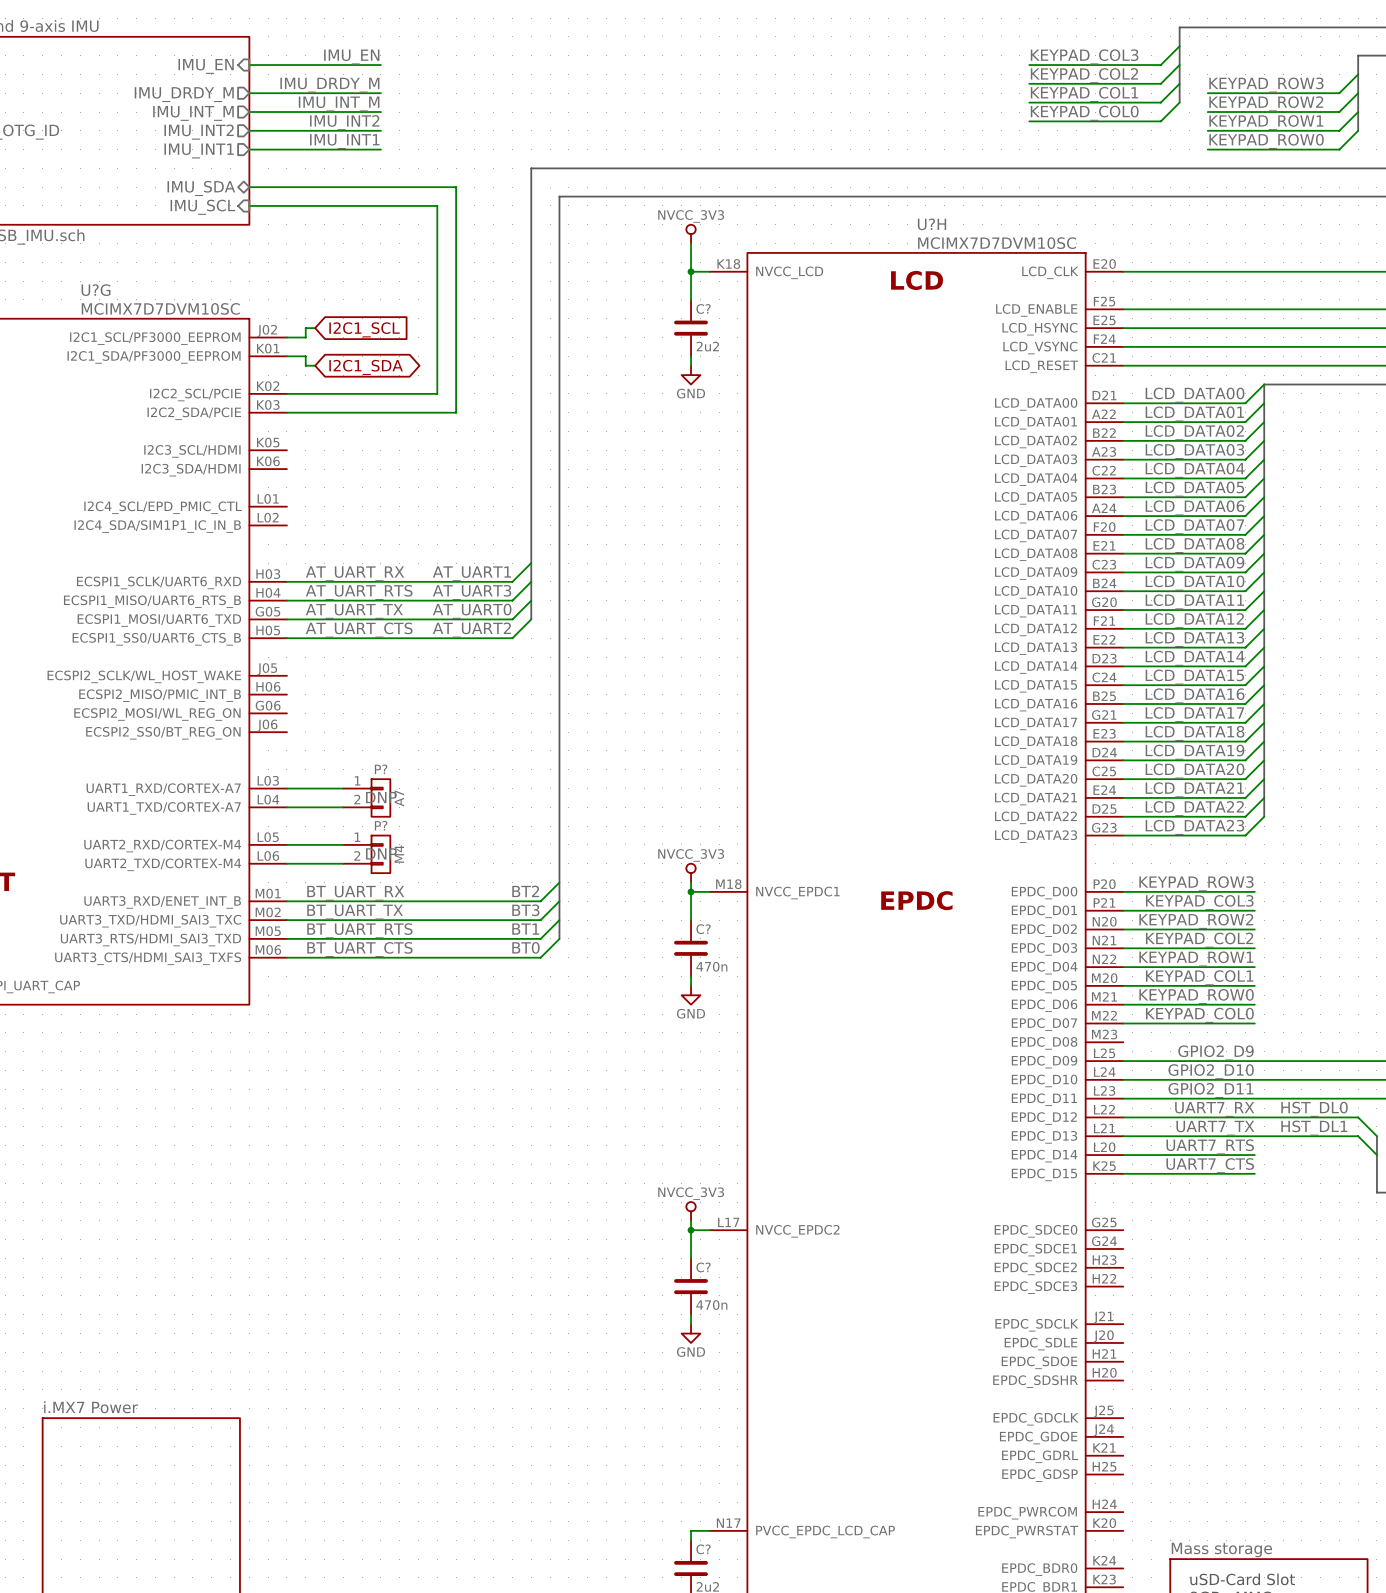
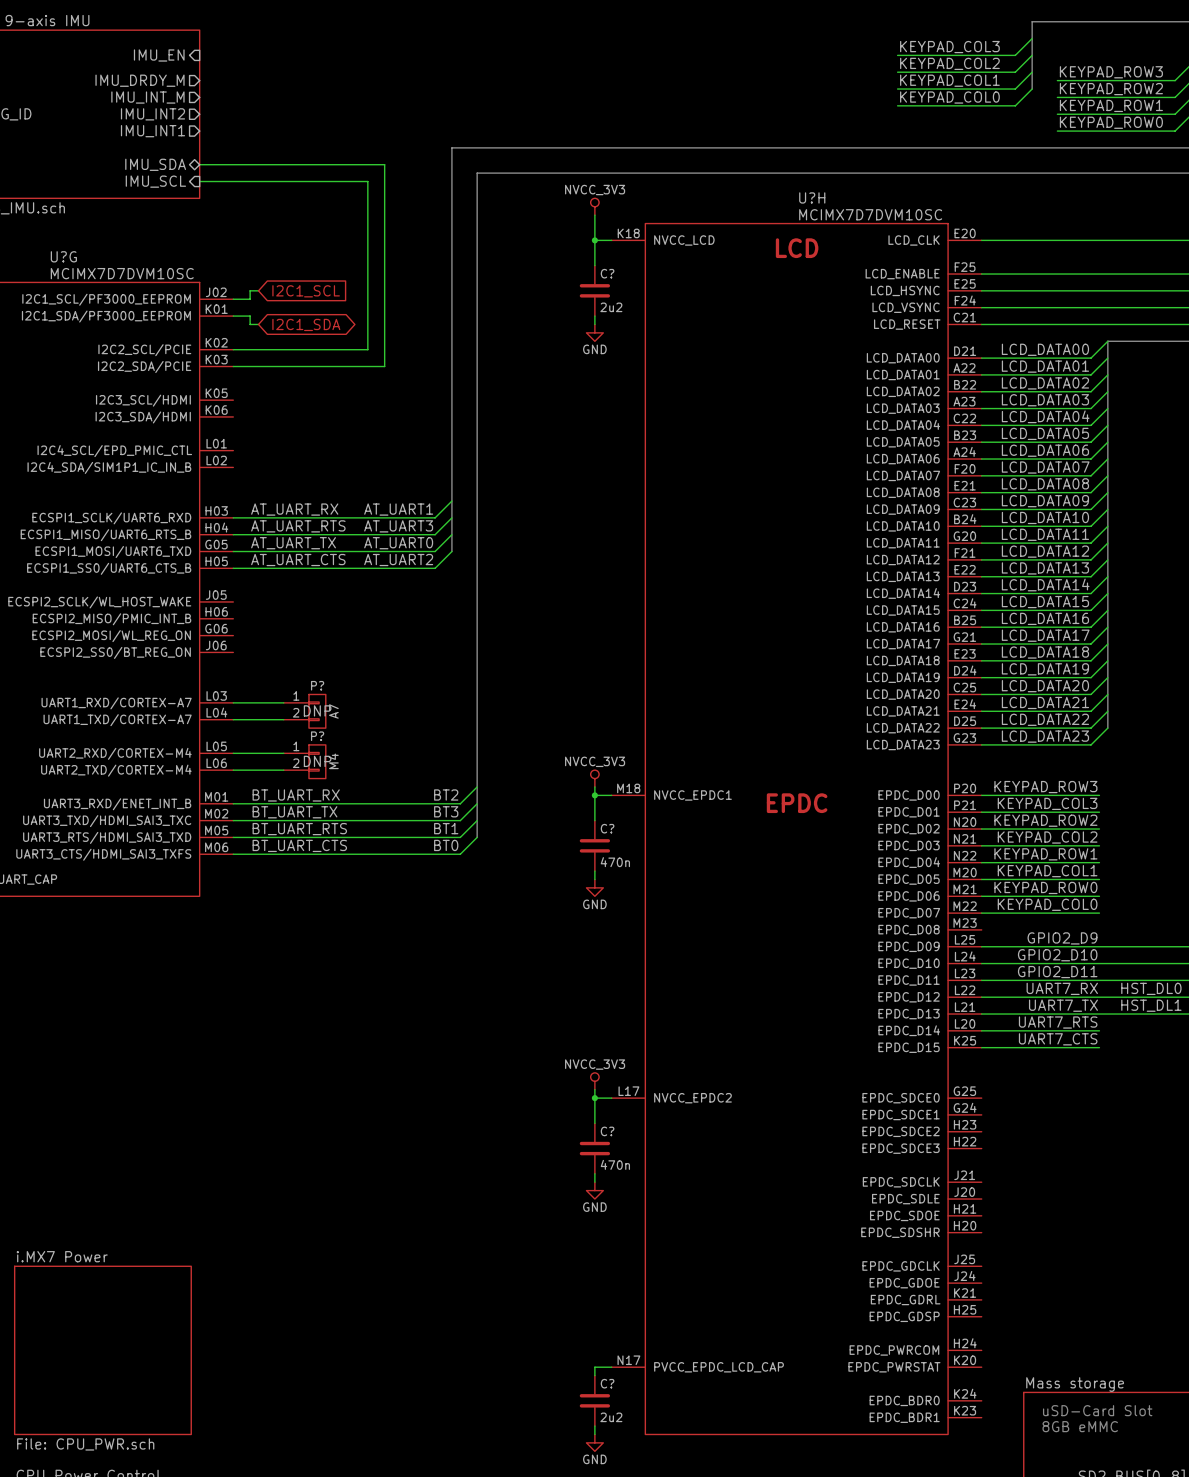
label: IMU_EN (351, 57) -> none
wire: (249, 65) (380, 65) -> none
label: IMU_DRDY_M (329, 85) -> none
wire: (249, 93) (380, 93) -> none
label: IMU_INT_M (339, 103) -> none
wire: (249, 112) (380, 112) -> none
label: IMU_INT2 (344, 122) -> none
wire: (249, 130) (380, 130) -> none
label: IMU_INT1 (344, 141) -> none
wire: (249, 149) (380, 149) -> none

